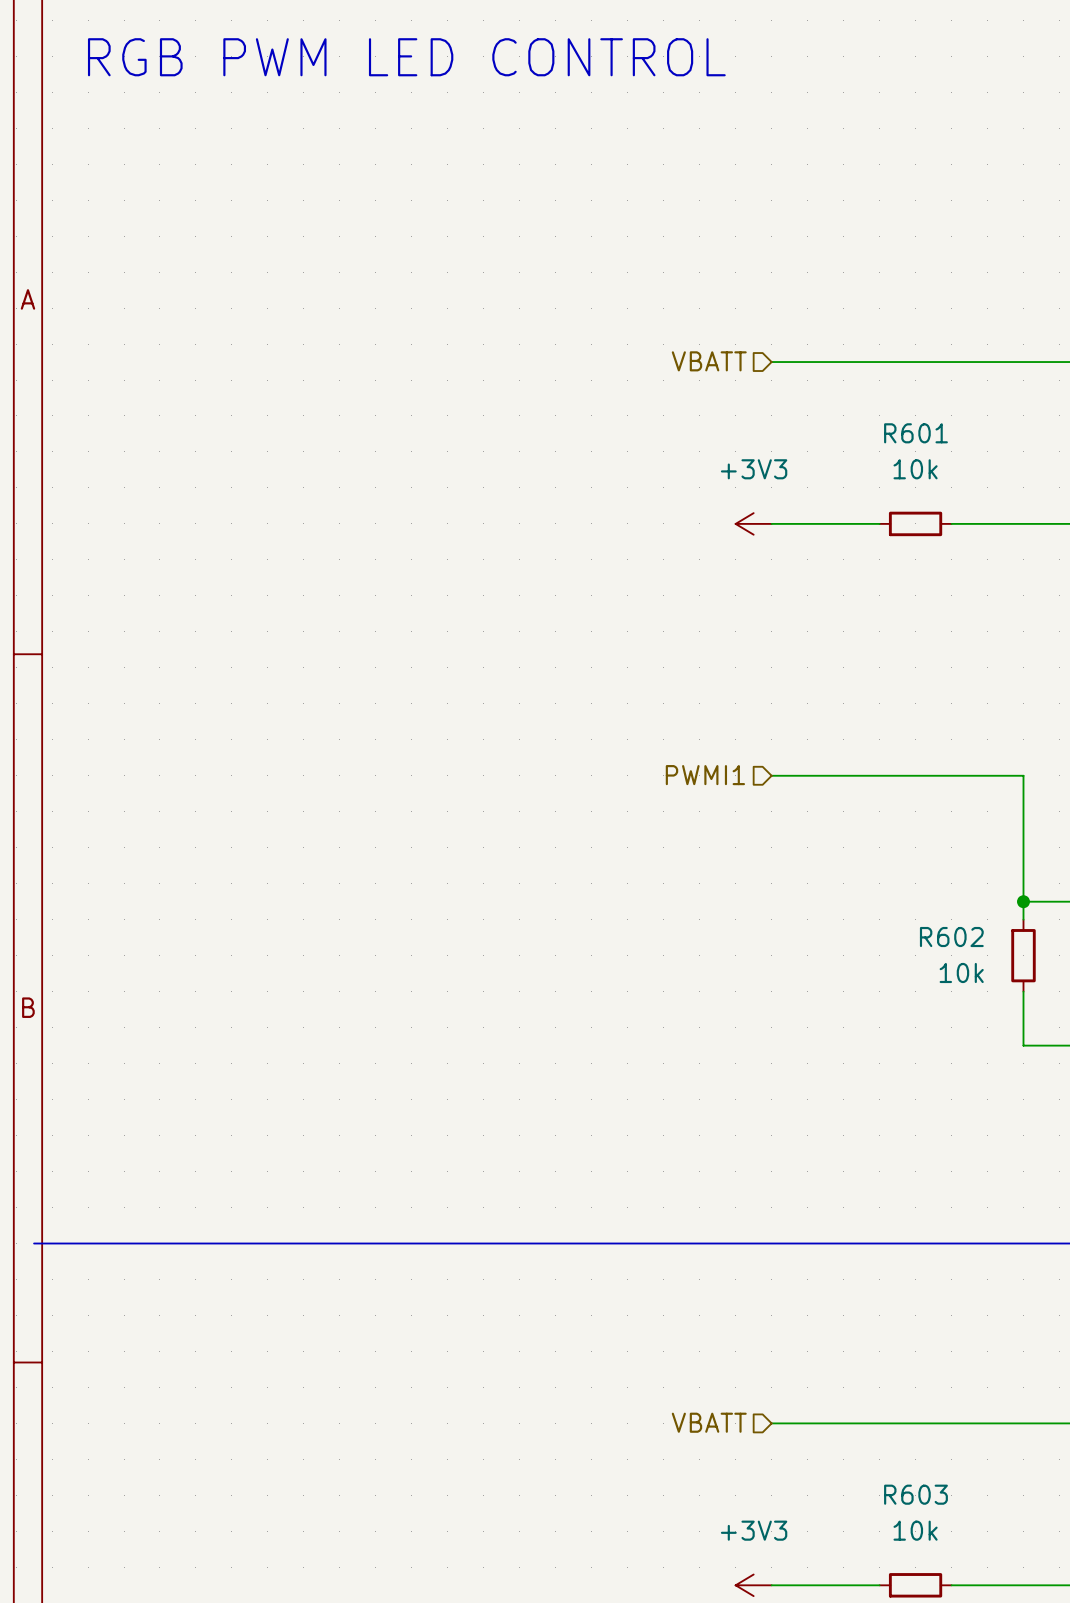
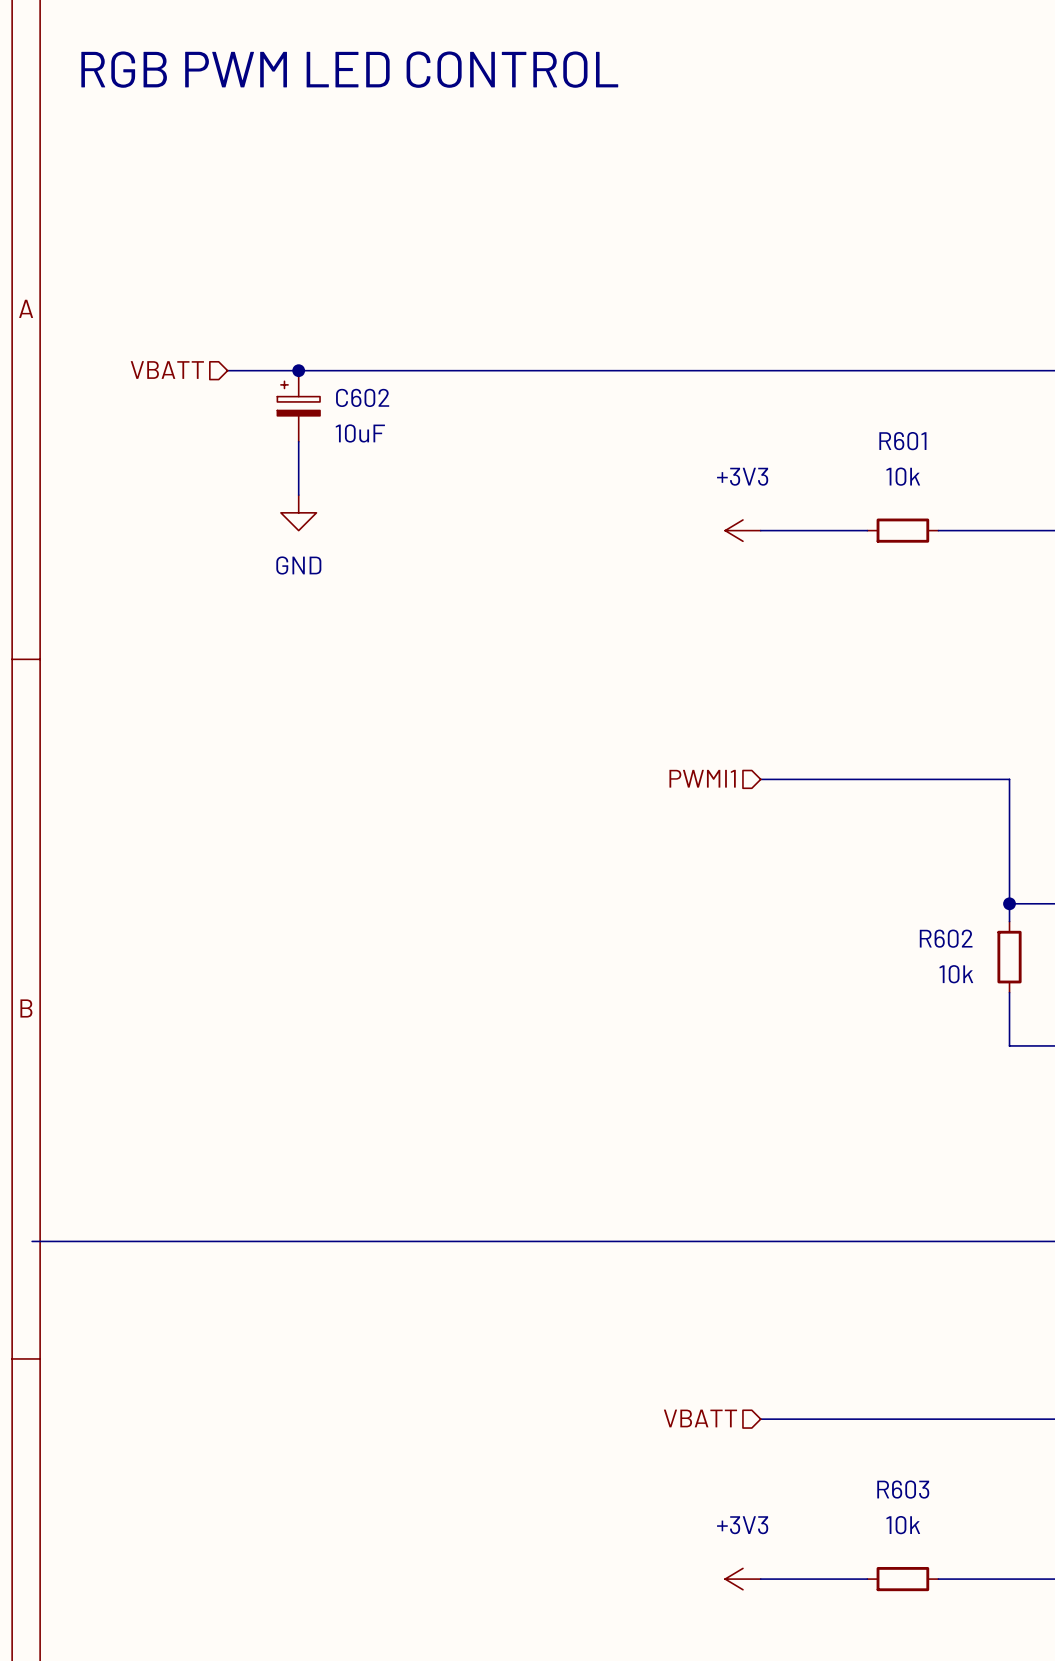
hierarchical label: none -> VBATT (167, 370)
hierarchical label: VBATT (709, 361) -> none
wire: none -> (227, 370) (760, 370)
junction: none -> (298, 370)
C602: none -> 10uF (298, 406)
wire: none -> (298, 441) (298, 495)
power symbol: none -> GND (298, 512)

